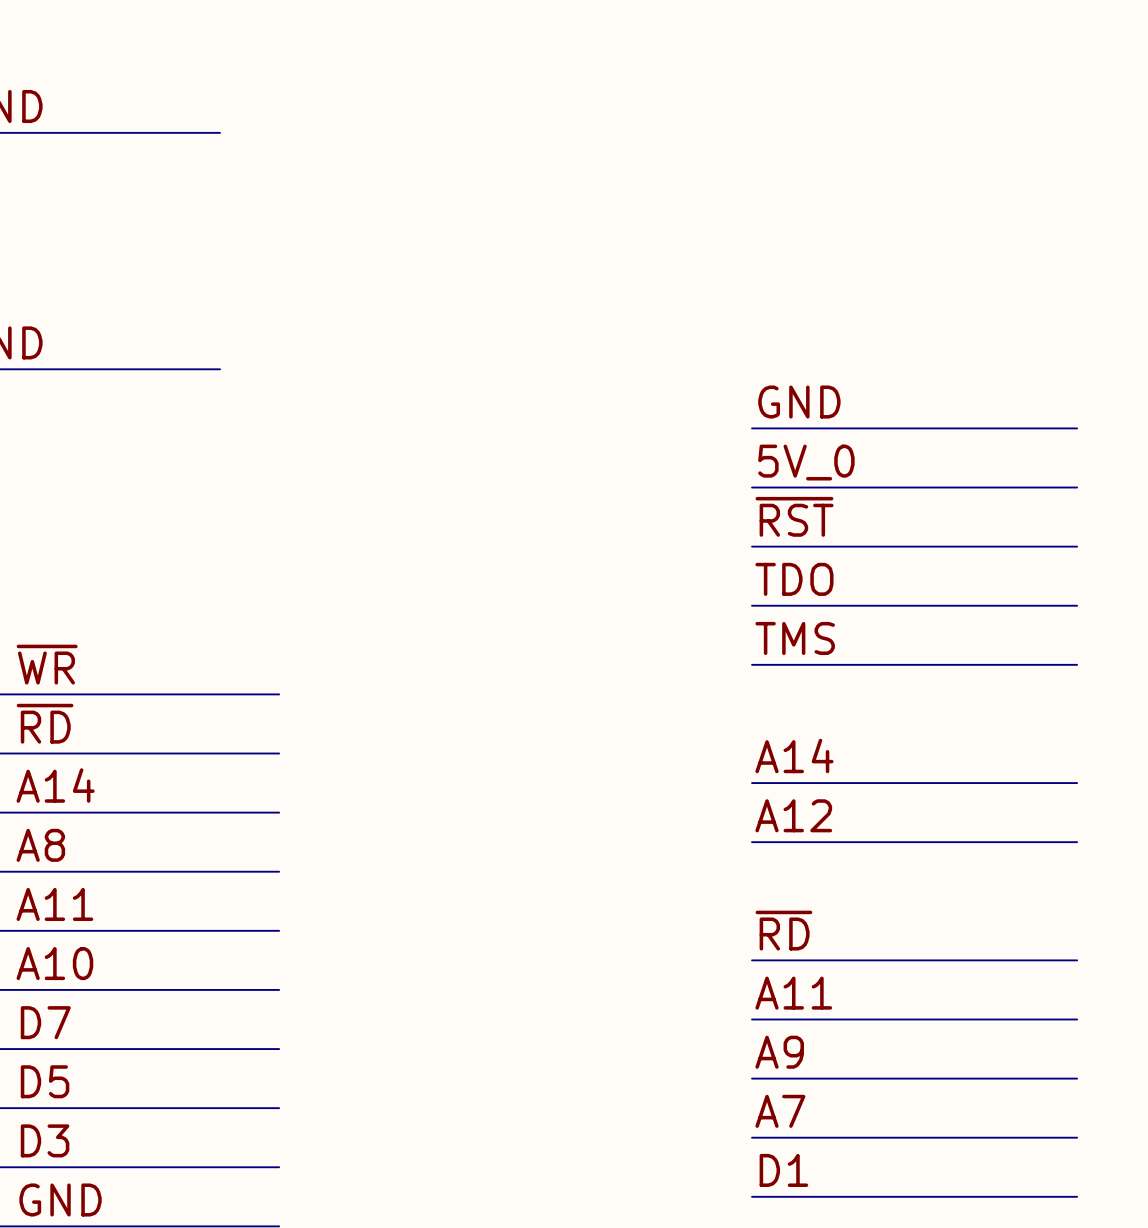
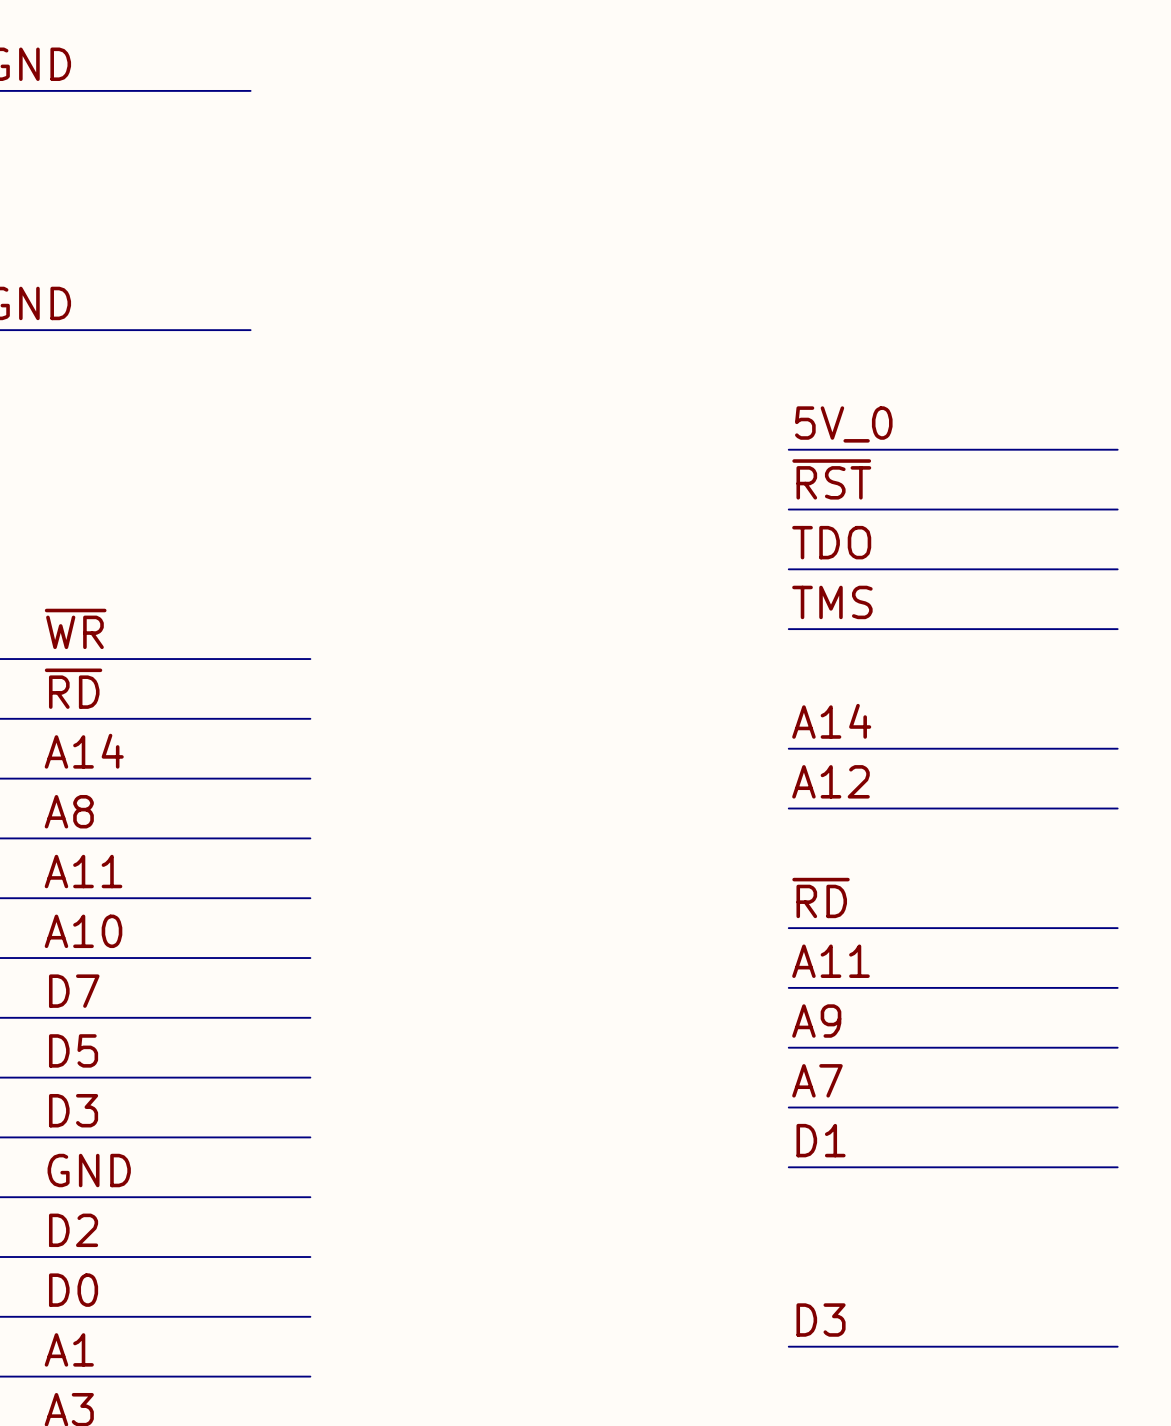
label: GND (799, 402) -> none
wire: (752, 428) (1077, 428) -> none

